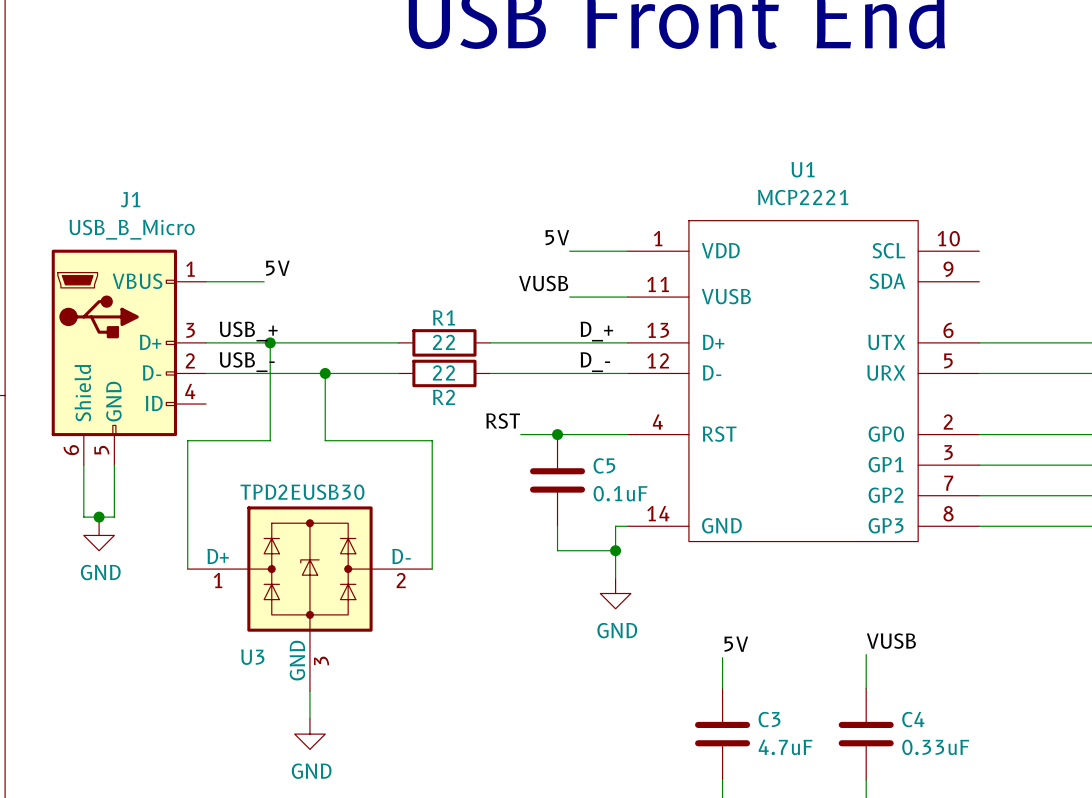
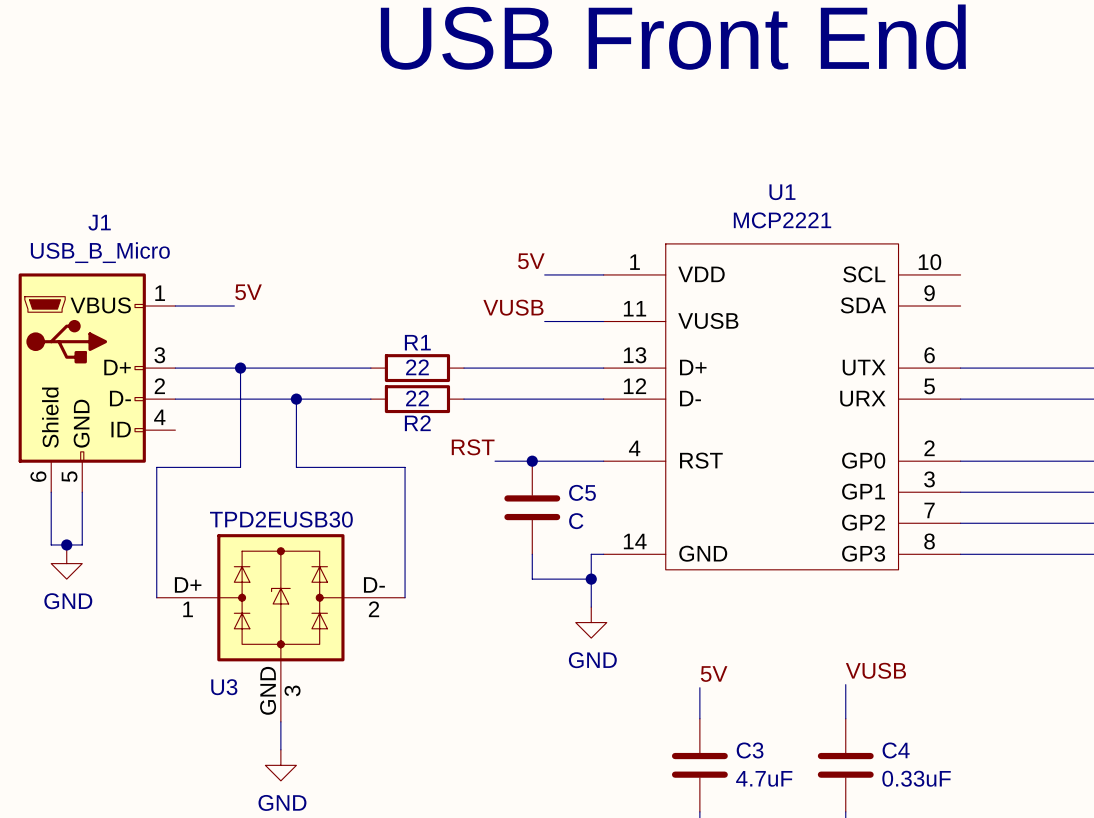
label: USB_+ (248, 331) -> none
label: D_+ (596, 331) -> none
label: USB_- (247, 362) -> none
label: D_- (595, 362) -> none
C5 value: 0.1uF (620, 493) -> C (576, 521)

